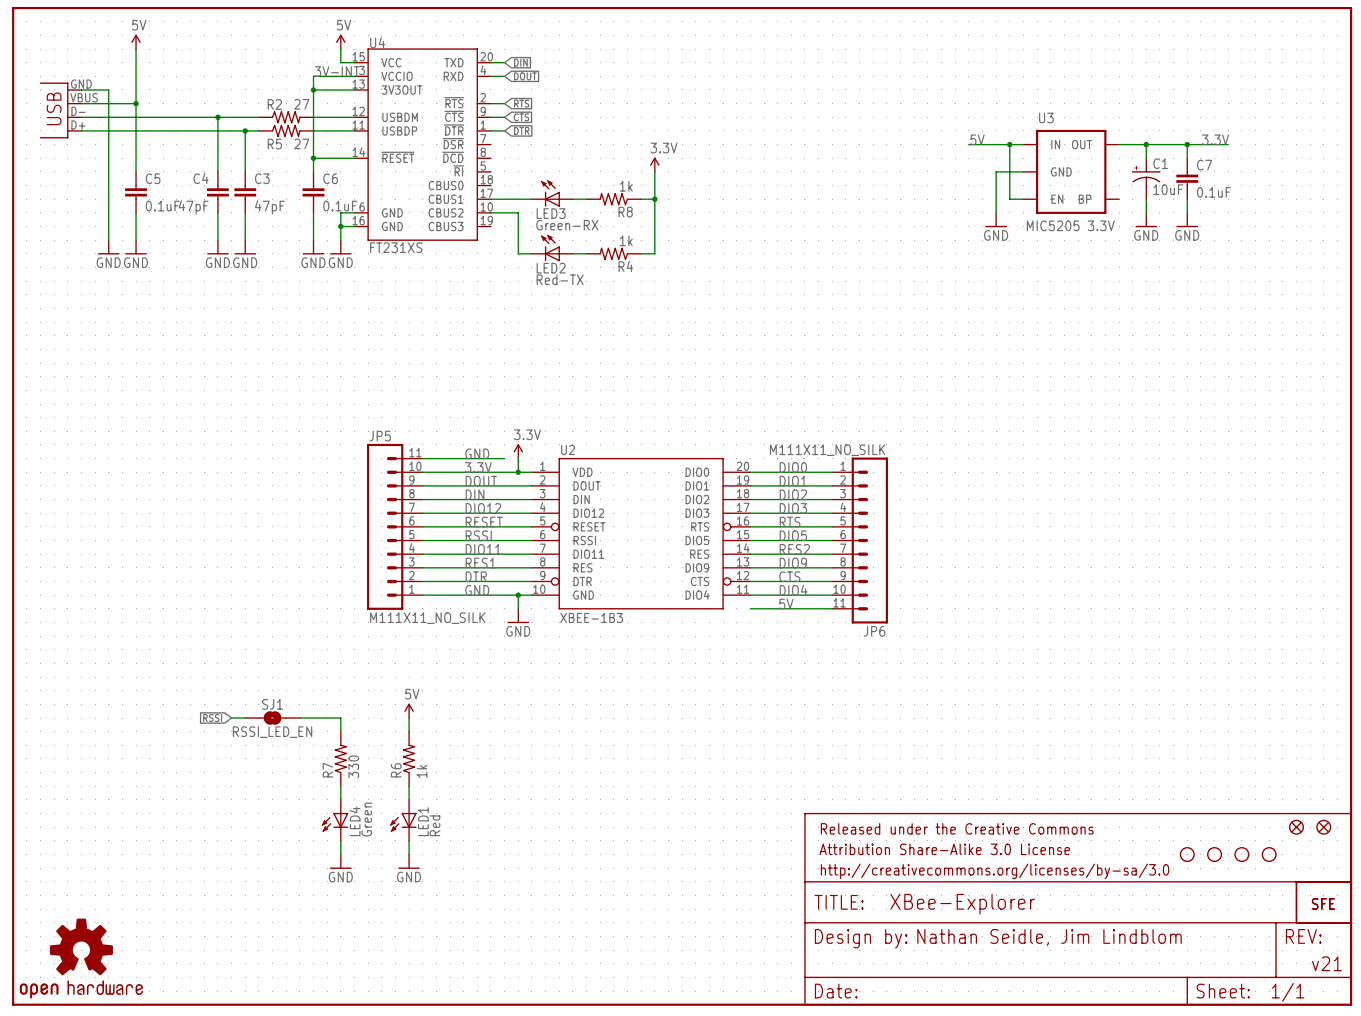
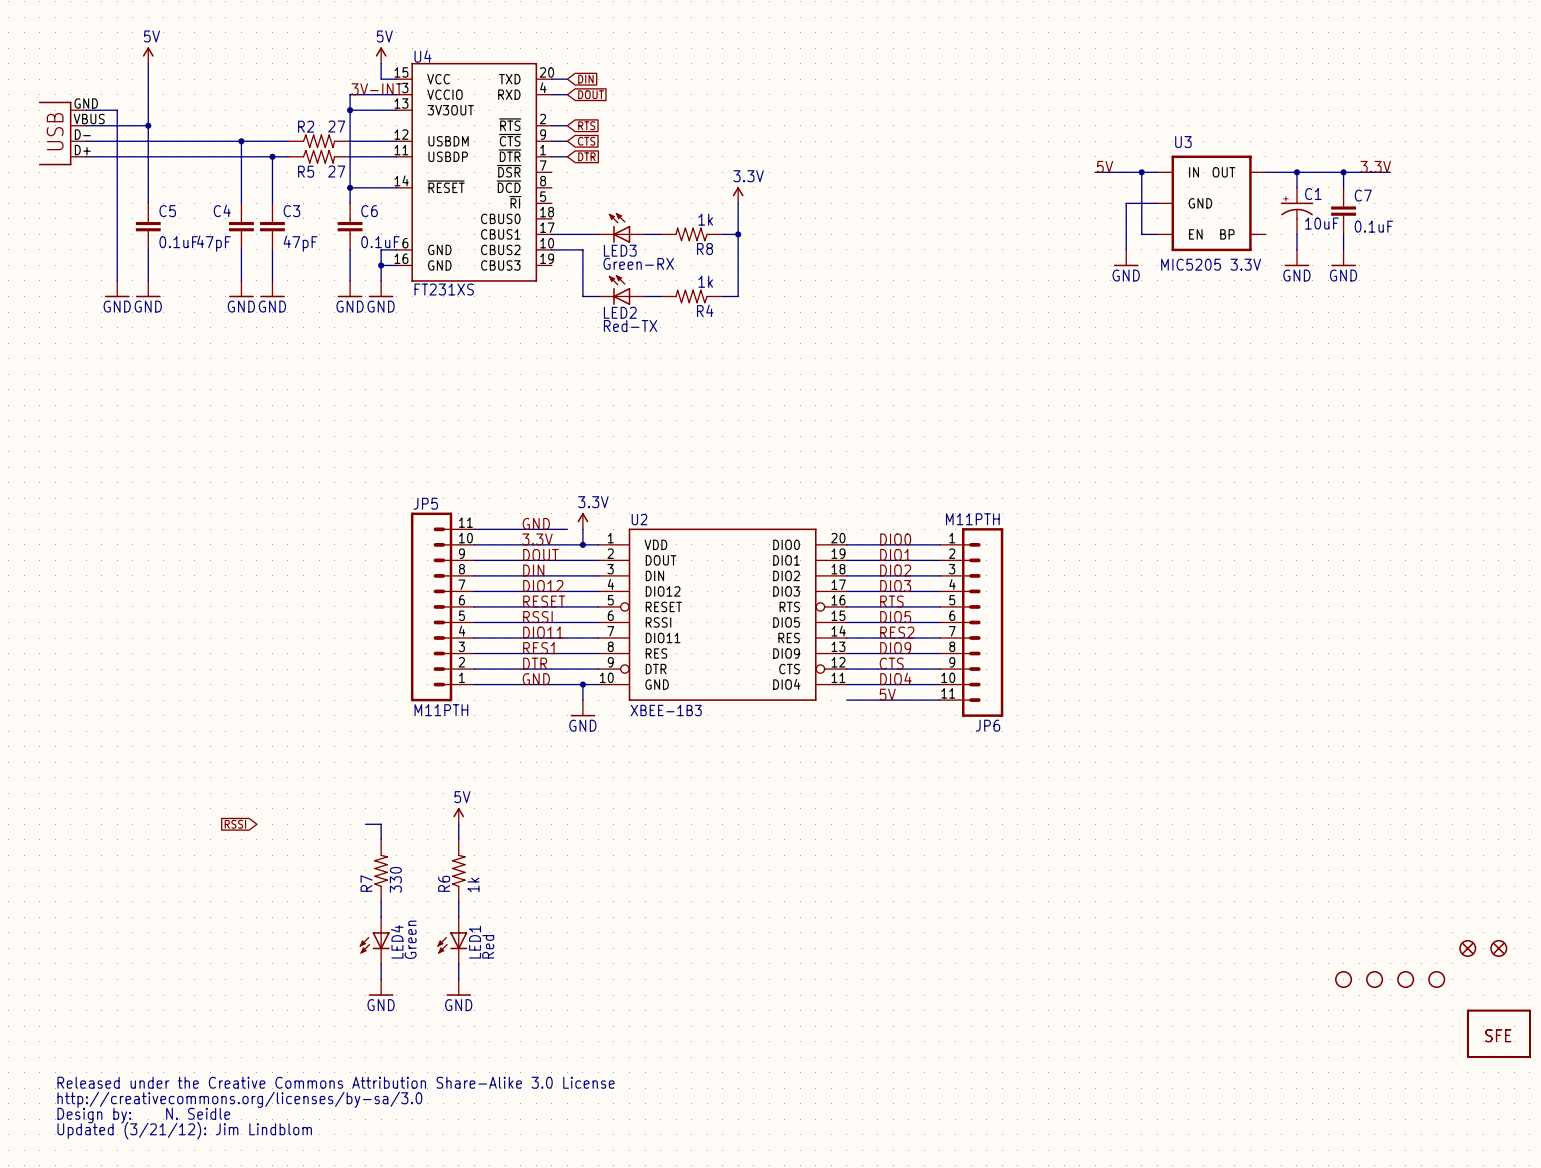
JP6 value: M111X11_NO_SILK (827, 450) -> M11PTH (972, 519)
part: (682, 506) -> none
JP5 value: M111X11_NO_SILK (427, 618) -> M11PTH (441, 710)
wire: (231, 718) (245, 718) -> none
SJ1: RSSI_LED_EN (272, 718) -> none
wire: (299, 718) (327, 718) -> none
part: (1078, 909) -> none
text: Nathan Seidle, Jim Lindblom (1049, 937) -> none
part: (81, 958) -> none
part: none -> (336, 1100)
text: v21 (1326, 963) -> none
text: none -> N. Seidle (198, 1113)
text: none -> Updated (3/21/12): Jim Lindblom (184, 1130)

